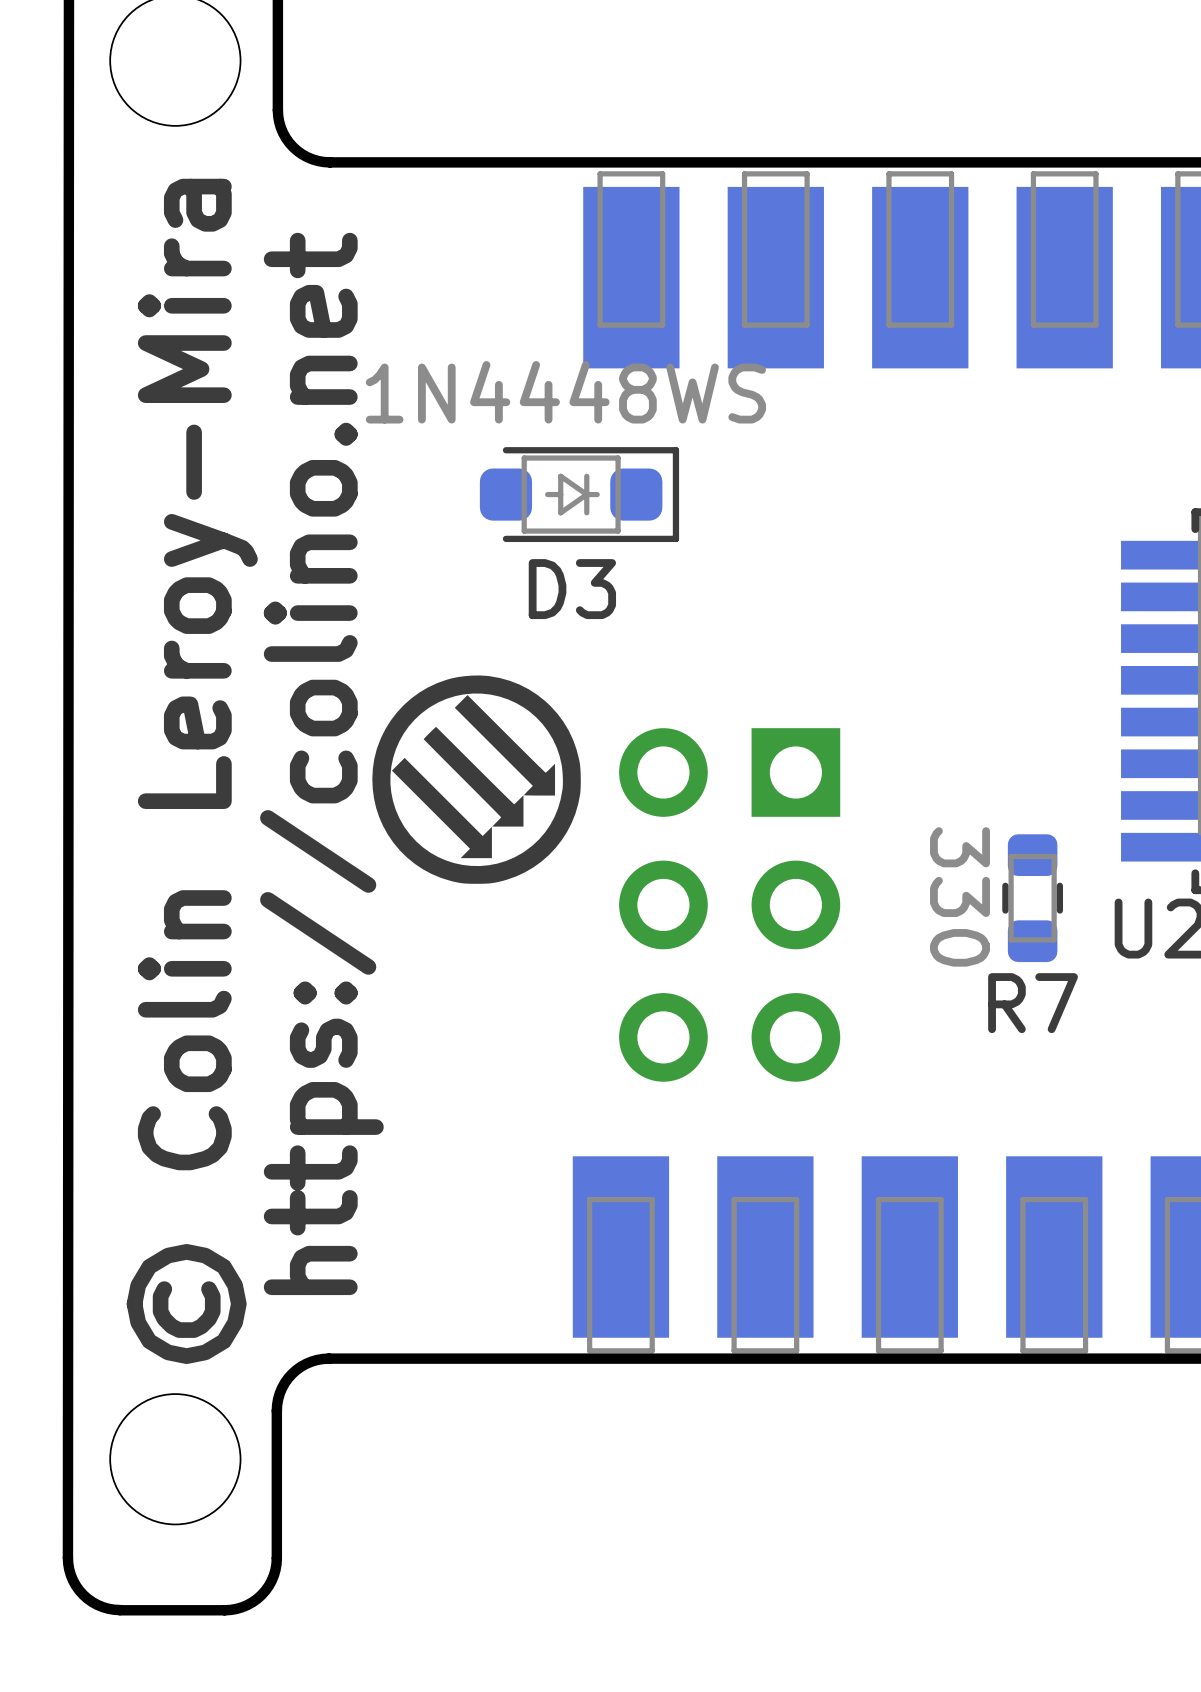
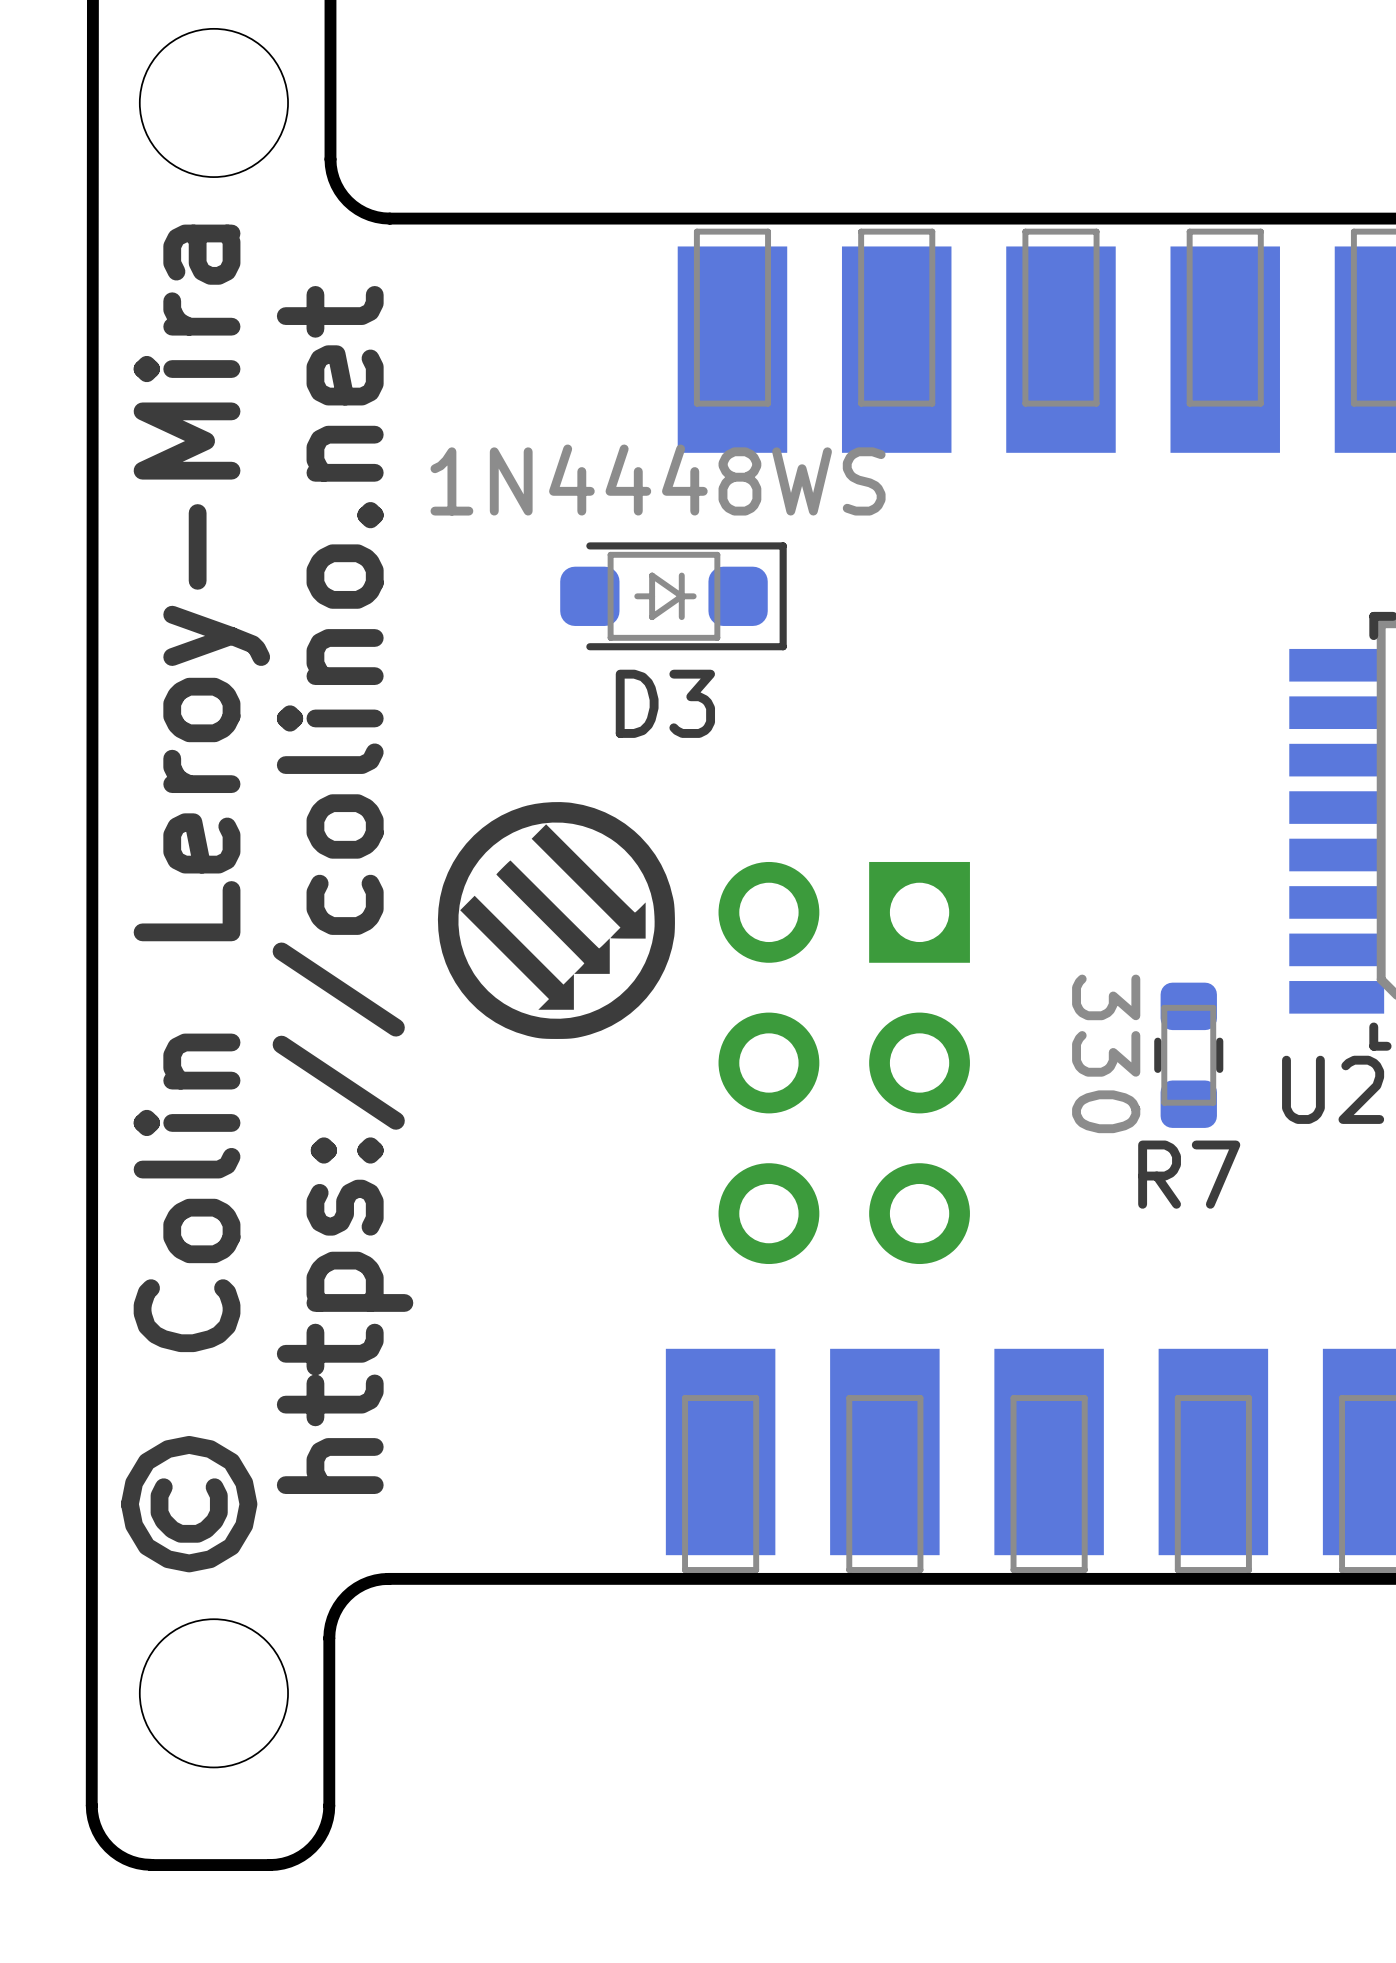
text position: https://colino.net (321, 763) -> https://colino.net (342, 890)
text position: © Colin Leroy-Mira (192, 771) -> © Colin Leroy-Mira (195, 898)

